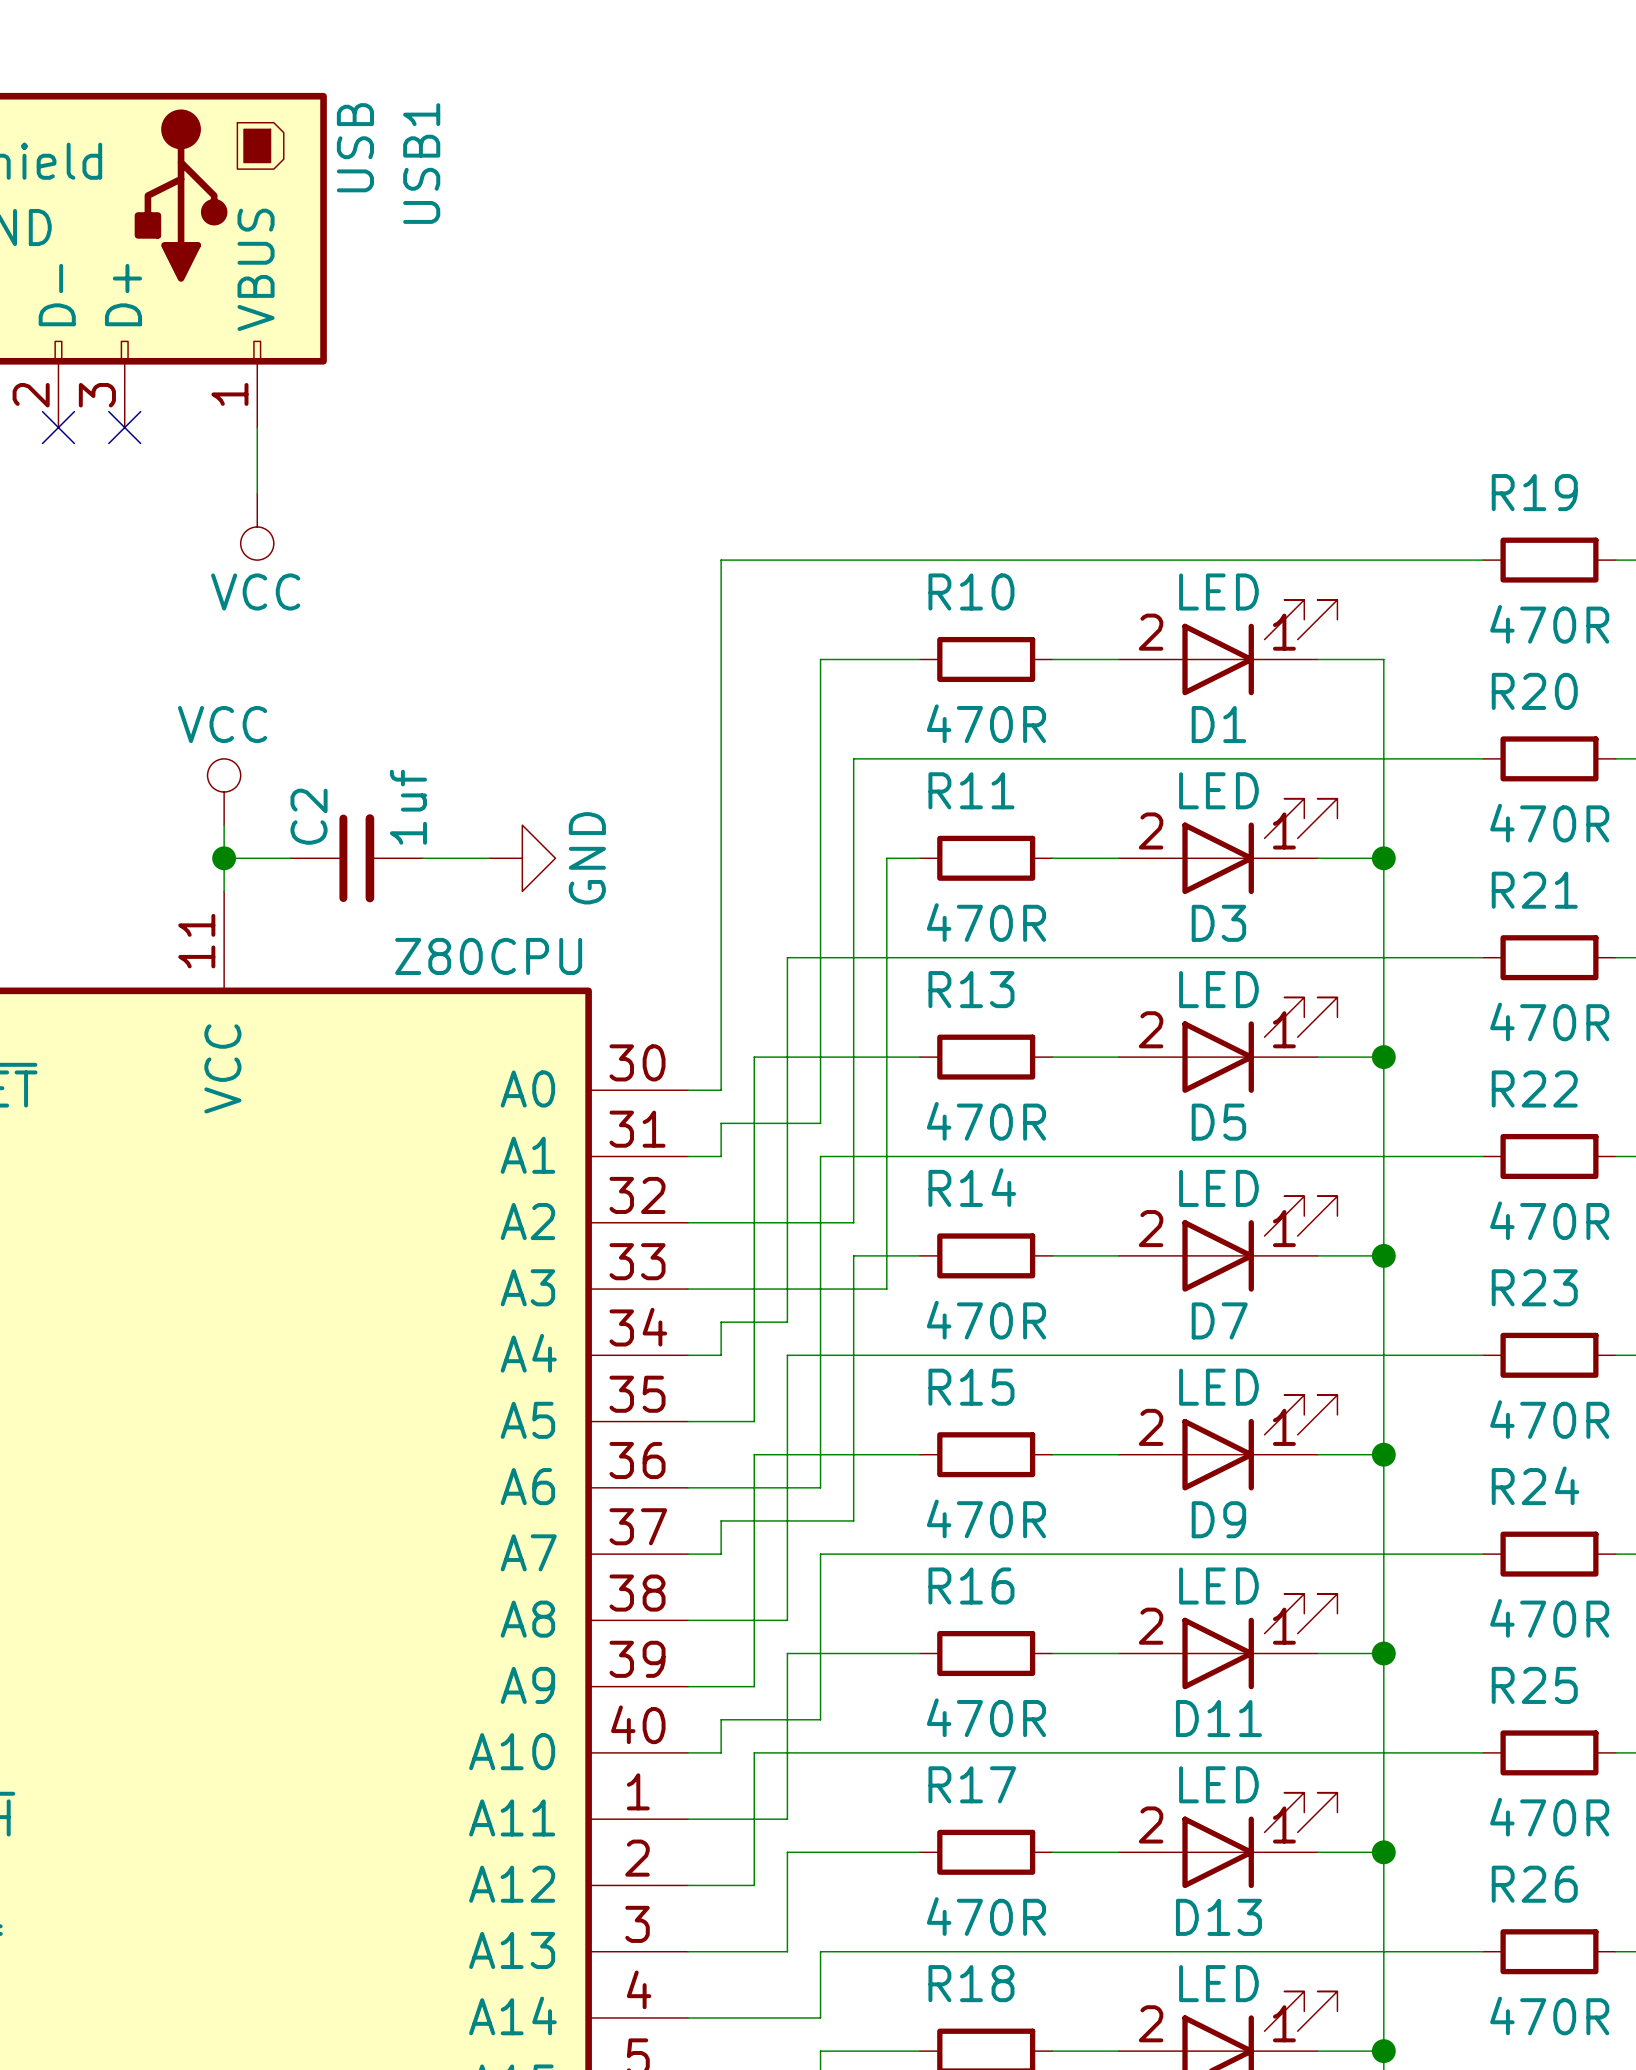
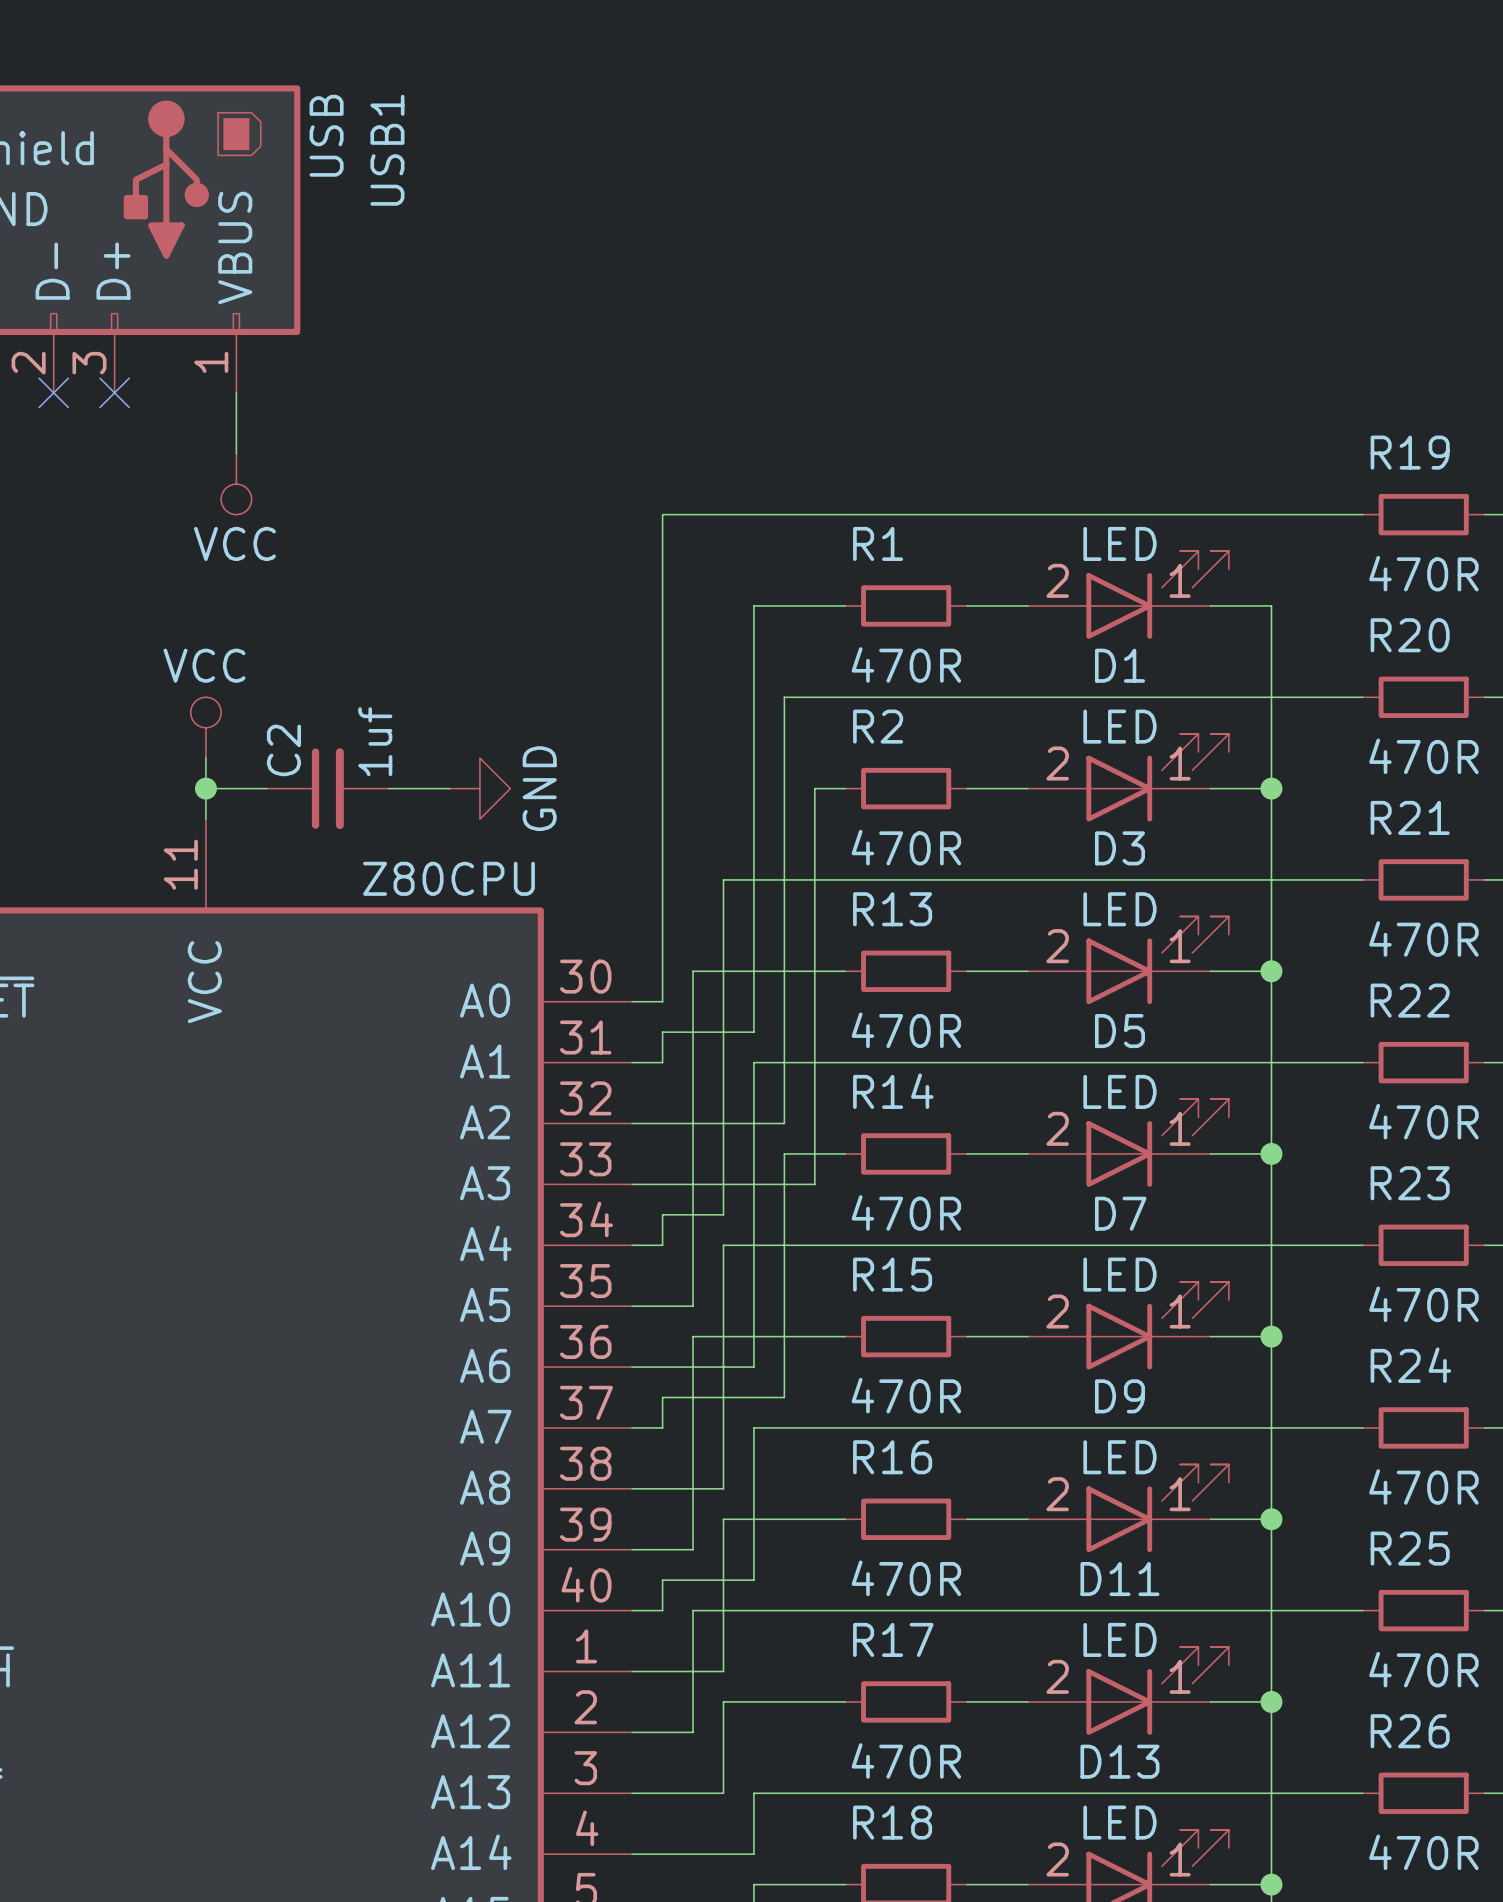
R10 name: R10 (971, 591) -> R1 (878, 543)
R11 name: R11 (971, 790) -> R2 (878, 726)

